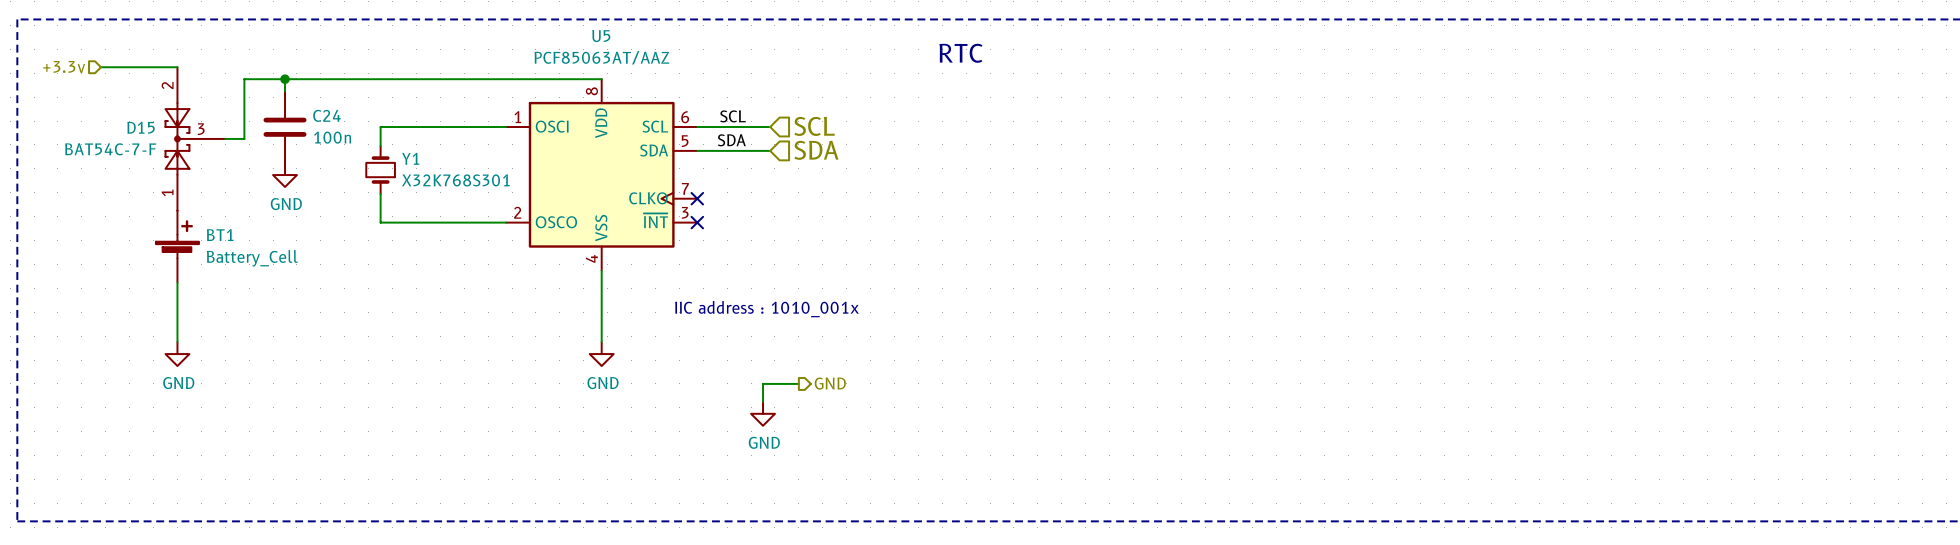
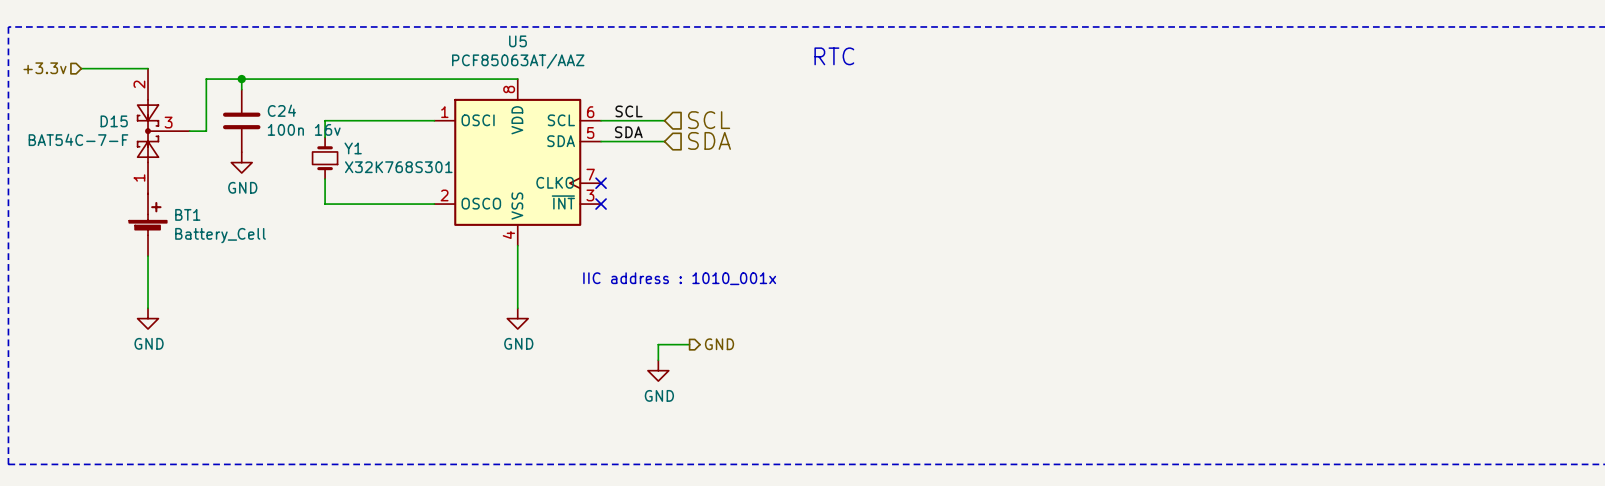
C24 value: 100n (332, 137) -> 100n 16v (304, 129)

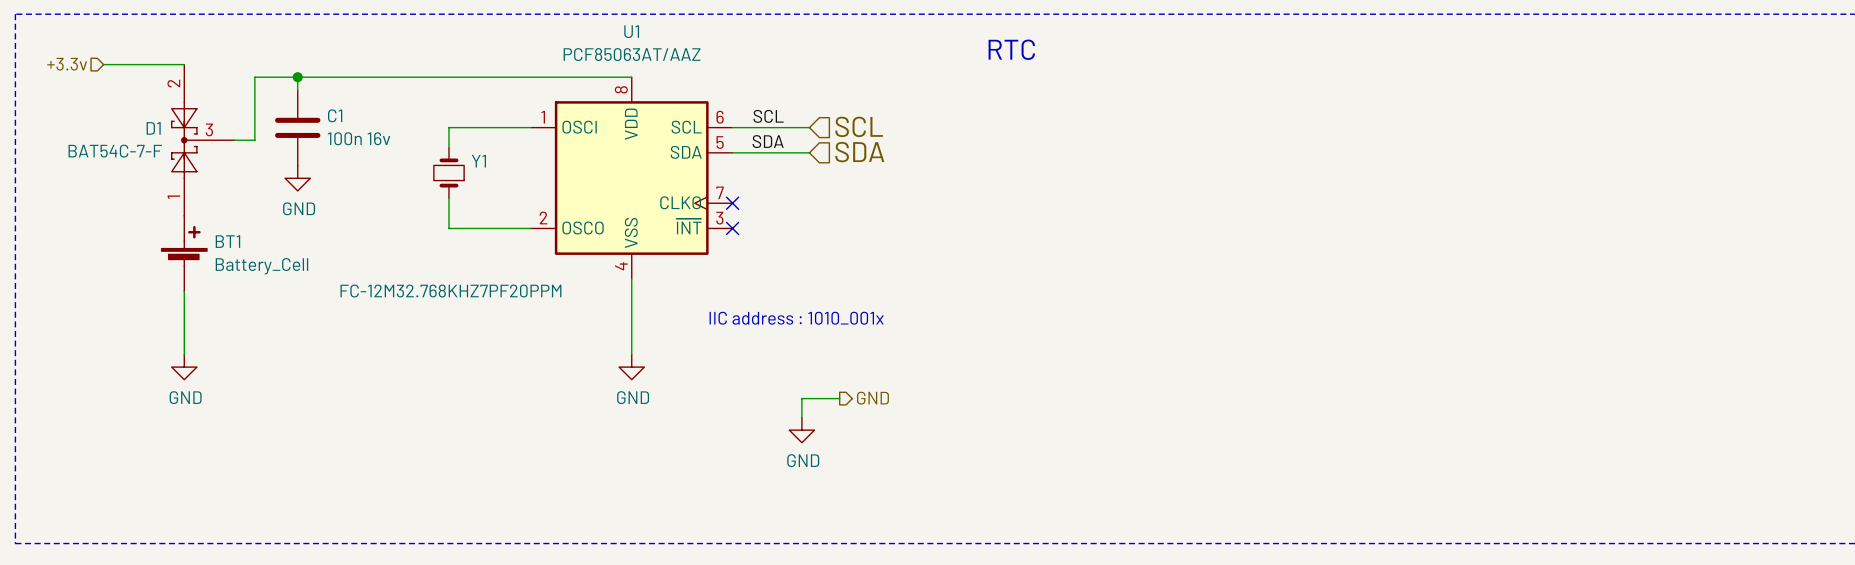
U5 name: U5 (517, 41) -> U1 (631, 31)
C24 name: C24 (281, 110) -> C1 (335, 115)
wire: (366, 120) (325, 120) (325, 137) -> (448, 127) (448, 147)
D15 name: D15 (114, 121) -> D1 (153, 128)
Y1 position: (325, 158) -> (448, 173)
Y1 value: X32K768S301 (398, 167) -> FC-12M32.768KHZ7PF20PPM (450, 291)
wire: (325, 179) (325, 204) (366, 204) -> (448, 198) (448, 228)

